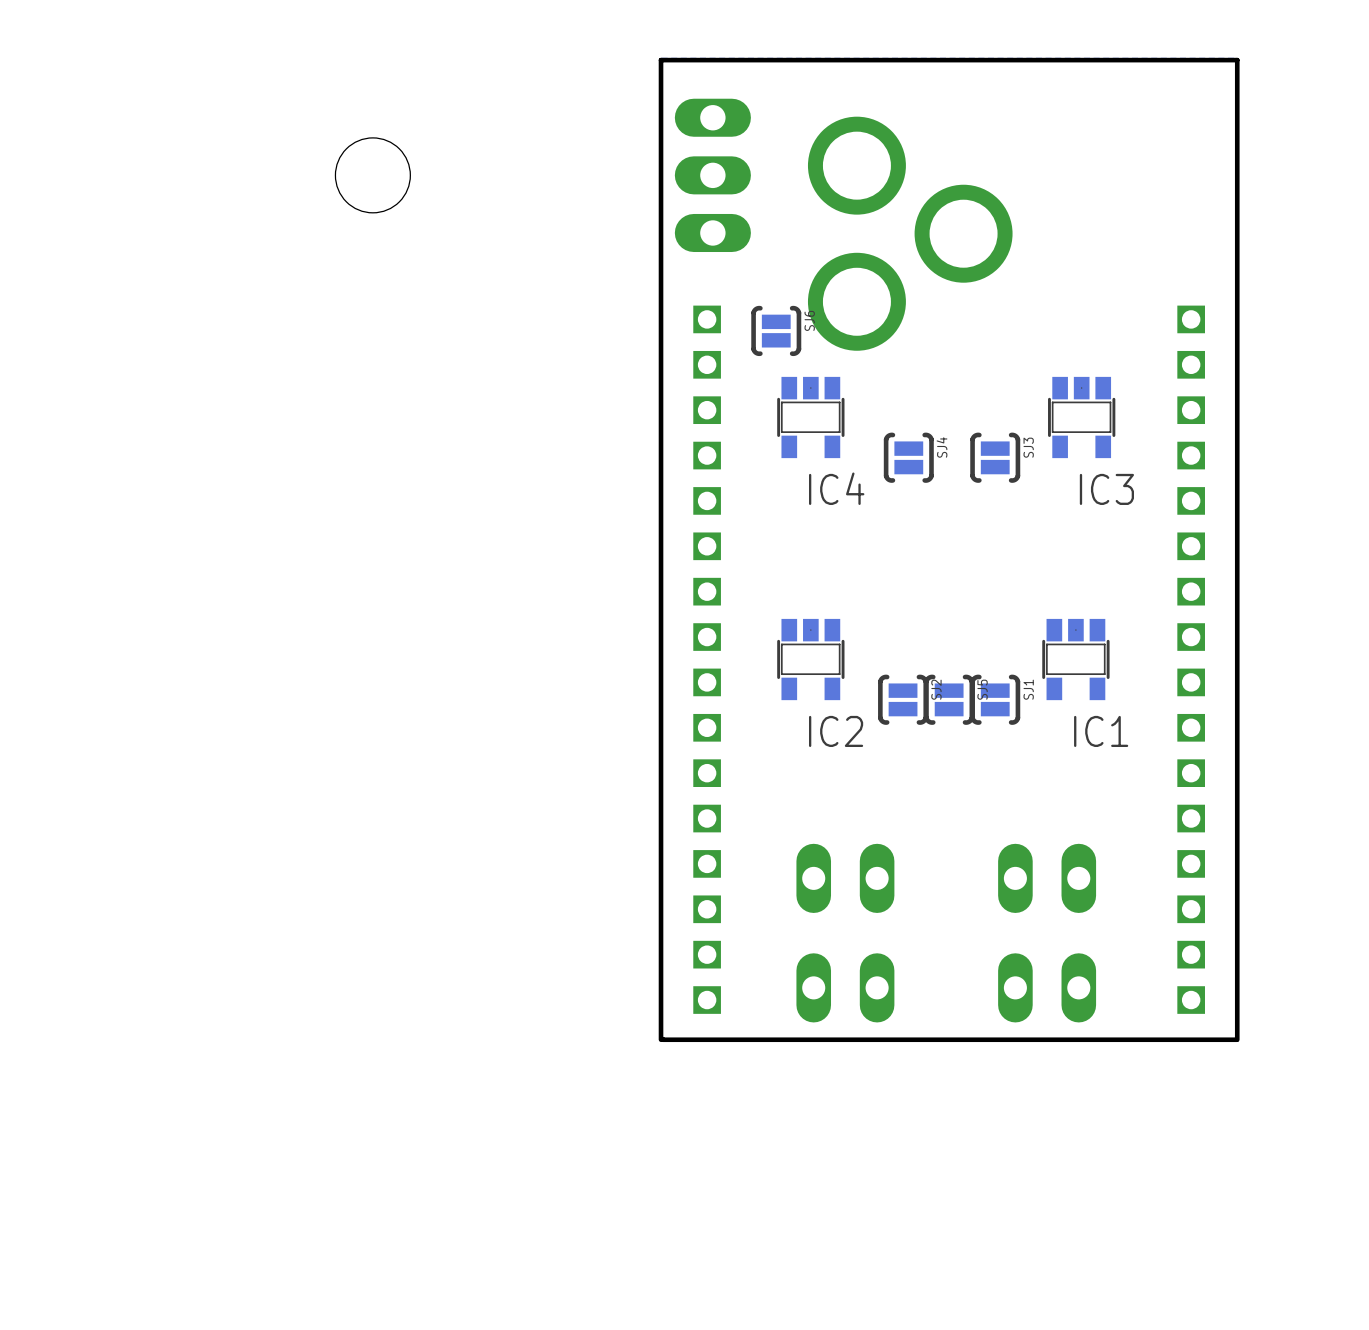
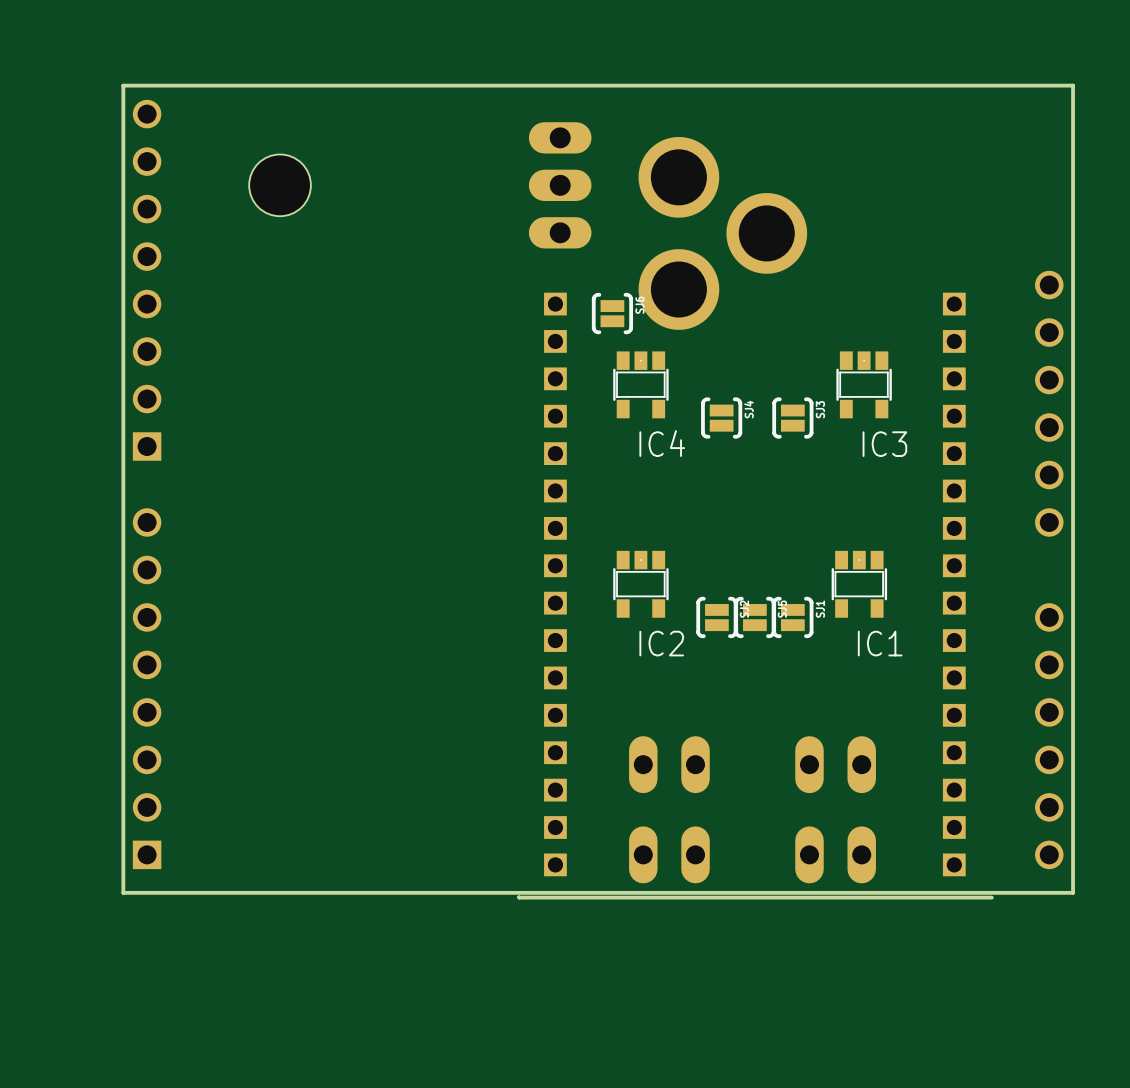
board edge: none -> (1073, 85) (1073, 892) (123, 892) (123, 85) (1073, 85)
part: none -> (147, 280)
part: none -> (1049, 403)
part: none -> (147, 688)
part: none -> (1049, 736)
board edge: (1237, 1039) (1237, 60) (661, 60) (661, 1039) -> none

